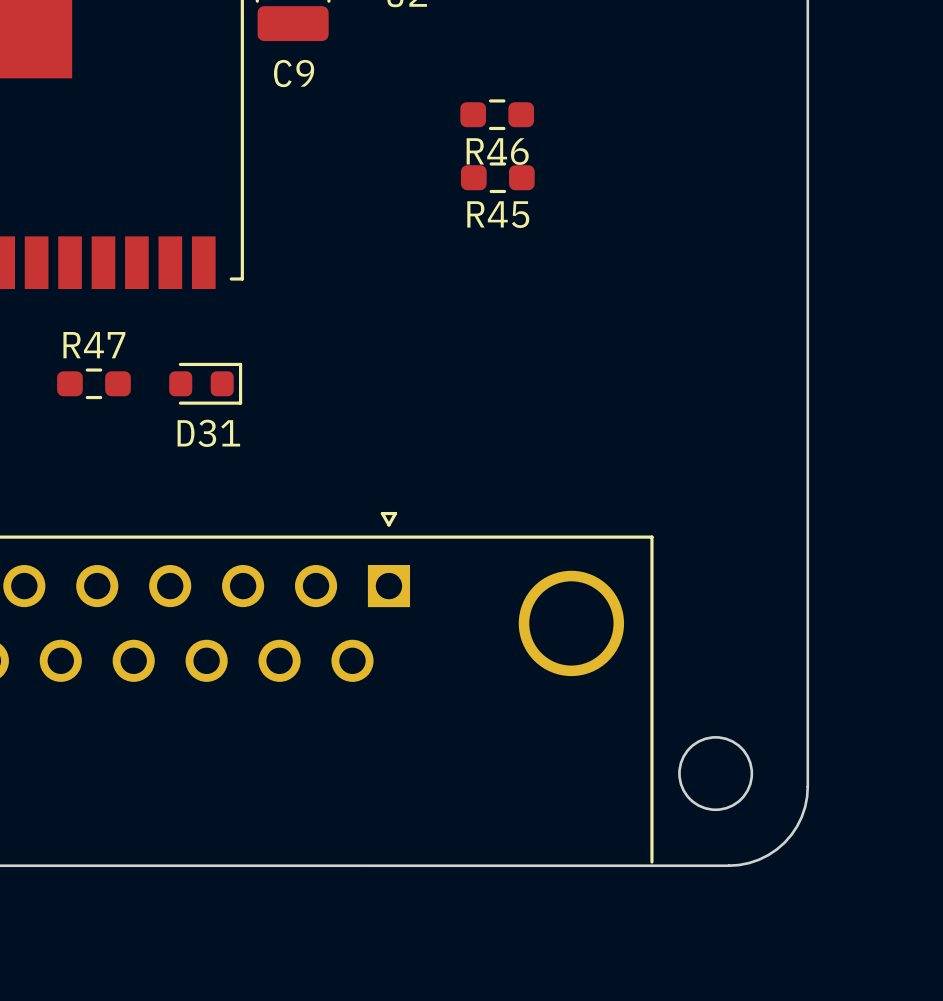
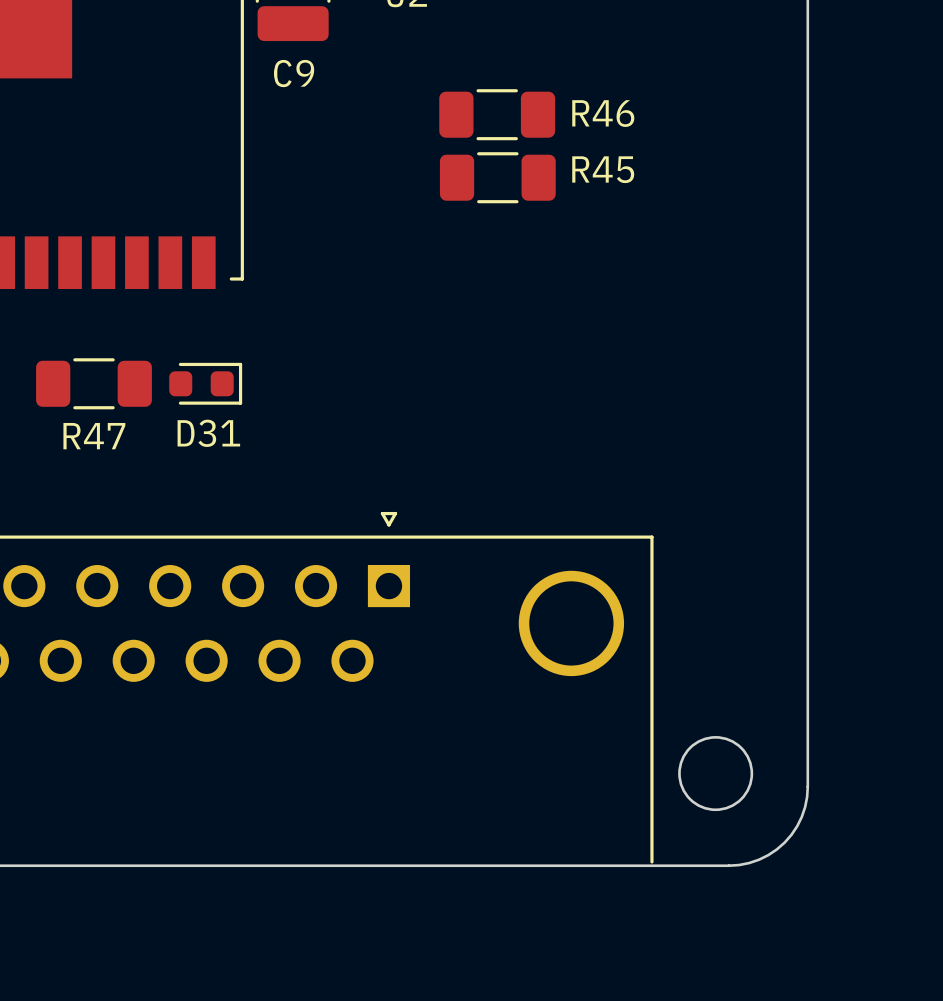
R46 footprint: [460, 99, 535, 131] -> [439, 89, 556, 141]
R46 name position: R46 (497, 151) -> R46 (603, 113)
R45 footprint: [460, 162, 535, 194] -> [439, 152, 556, 204]
R45 name position: R45 (498, 214) -> R45 (603, 169)
R47 name position: R47 (94, 345) -> R47 (94, 436)
R47 footprint: [57, 368, 131, 400] -> [36, 358, 152, 410]

